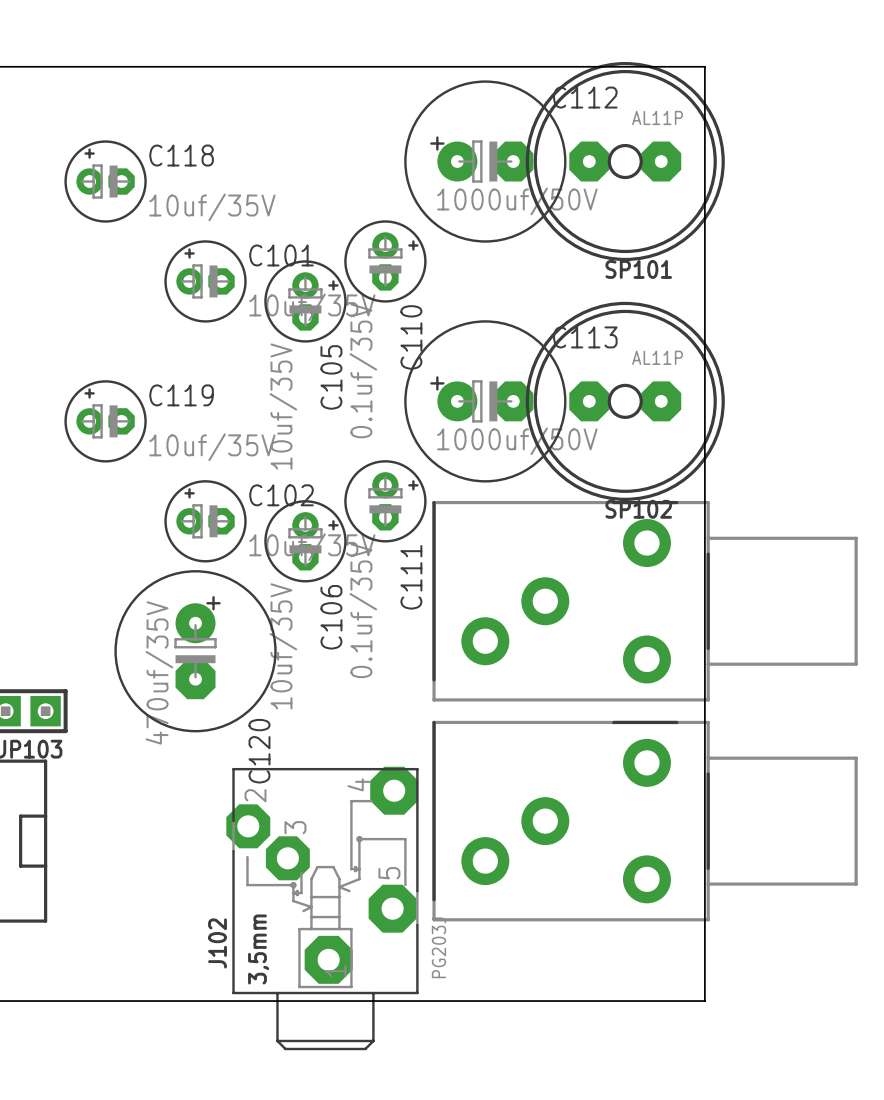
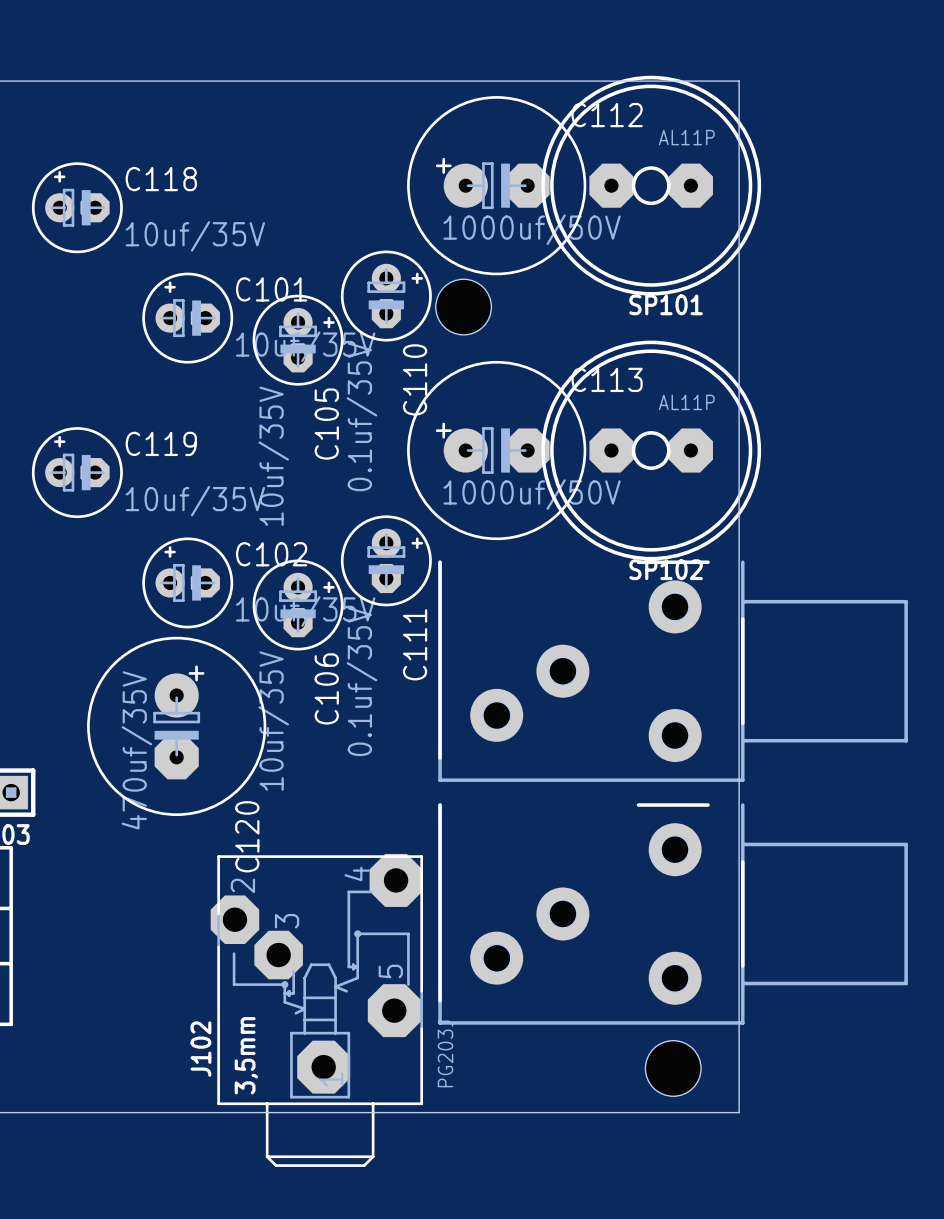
hole: none -> (463, 307)
part footprint: [432, 500, 858, 702] -> [438, 560, 908, 782]
part footprint: [432, 720, 858, 922] -> [438, 803, 908, 1025]
hole: none -> (673, 1068)

